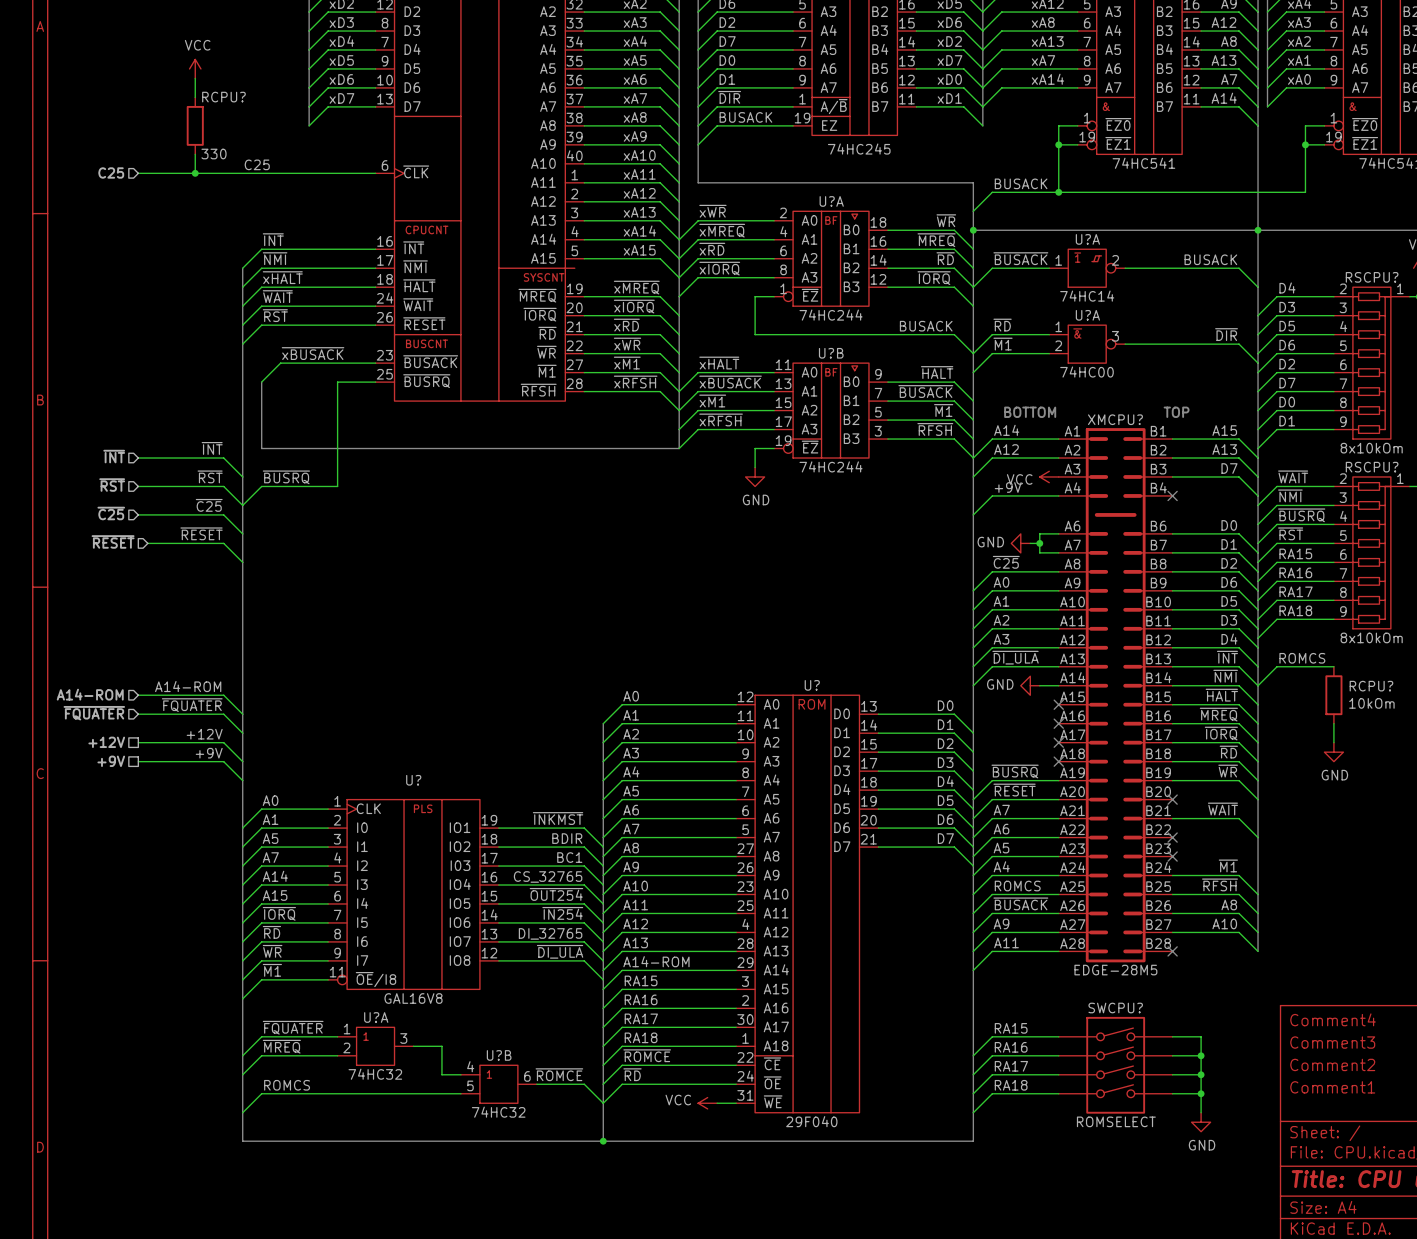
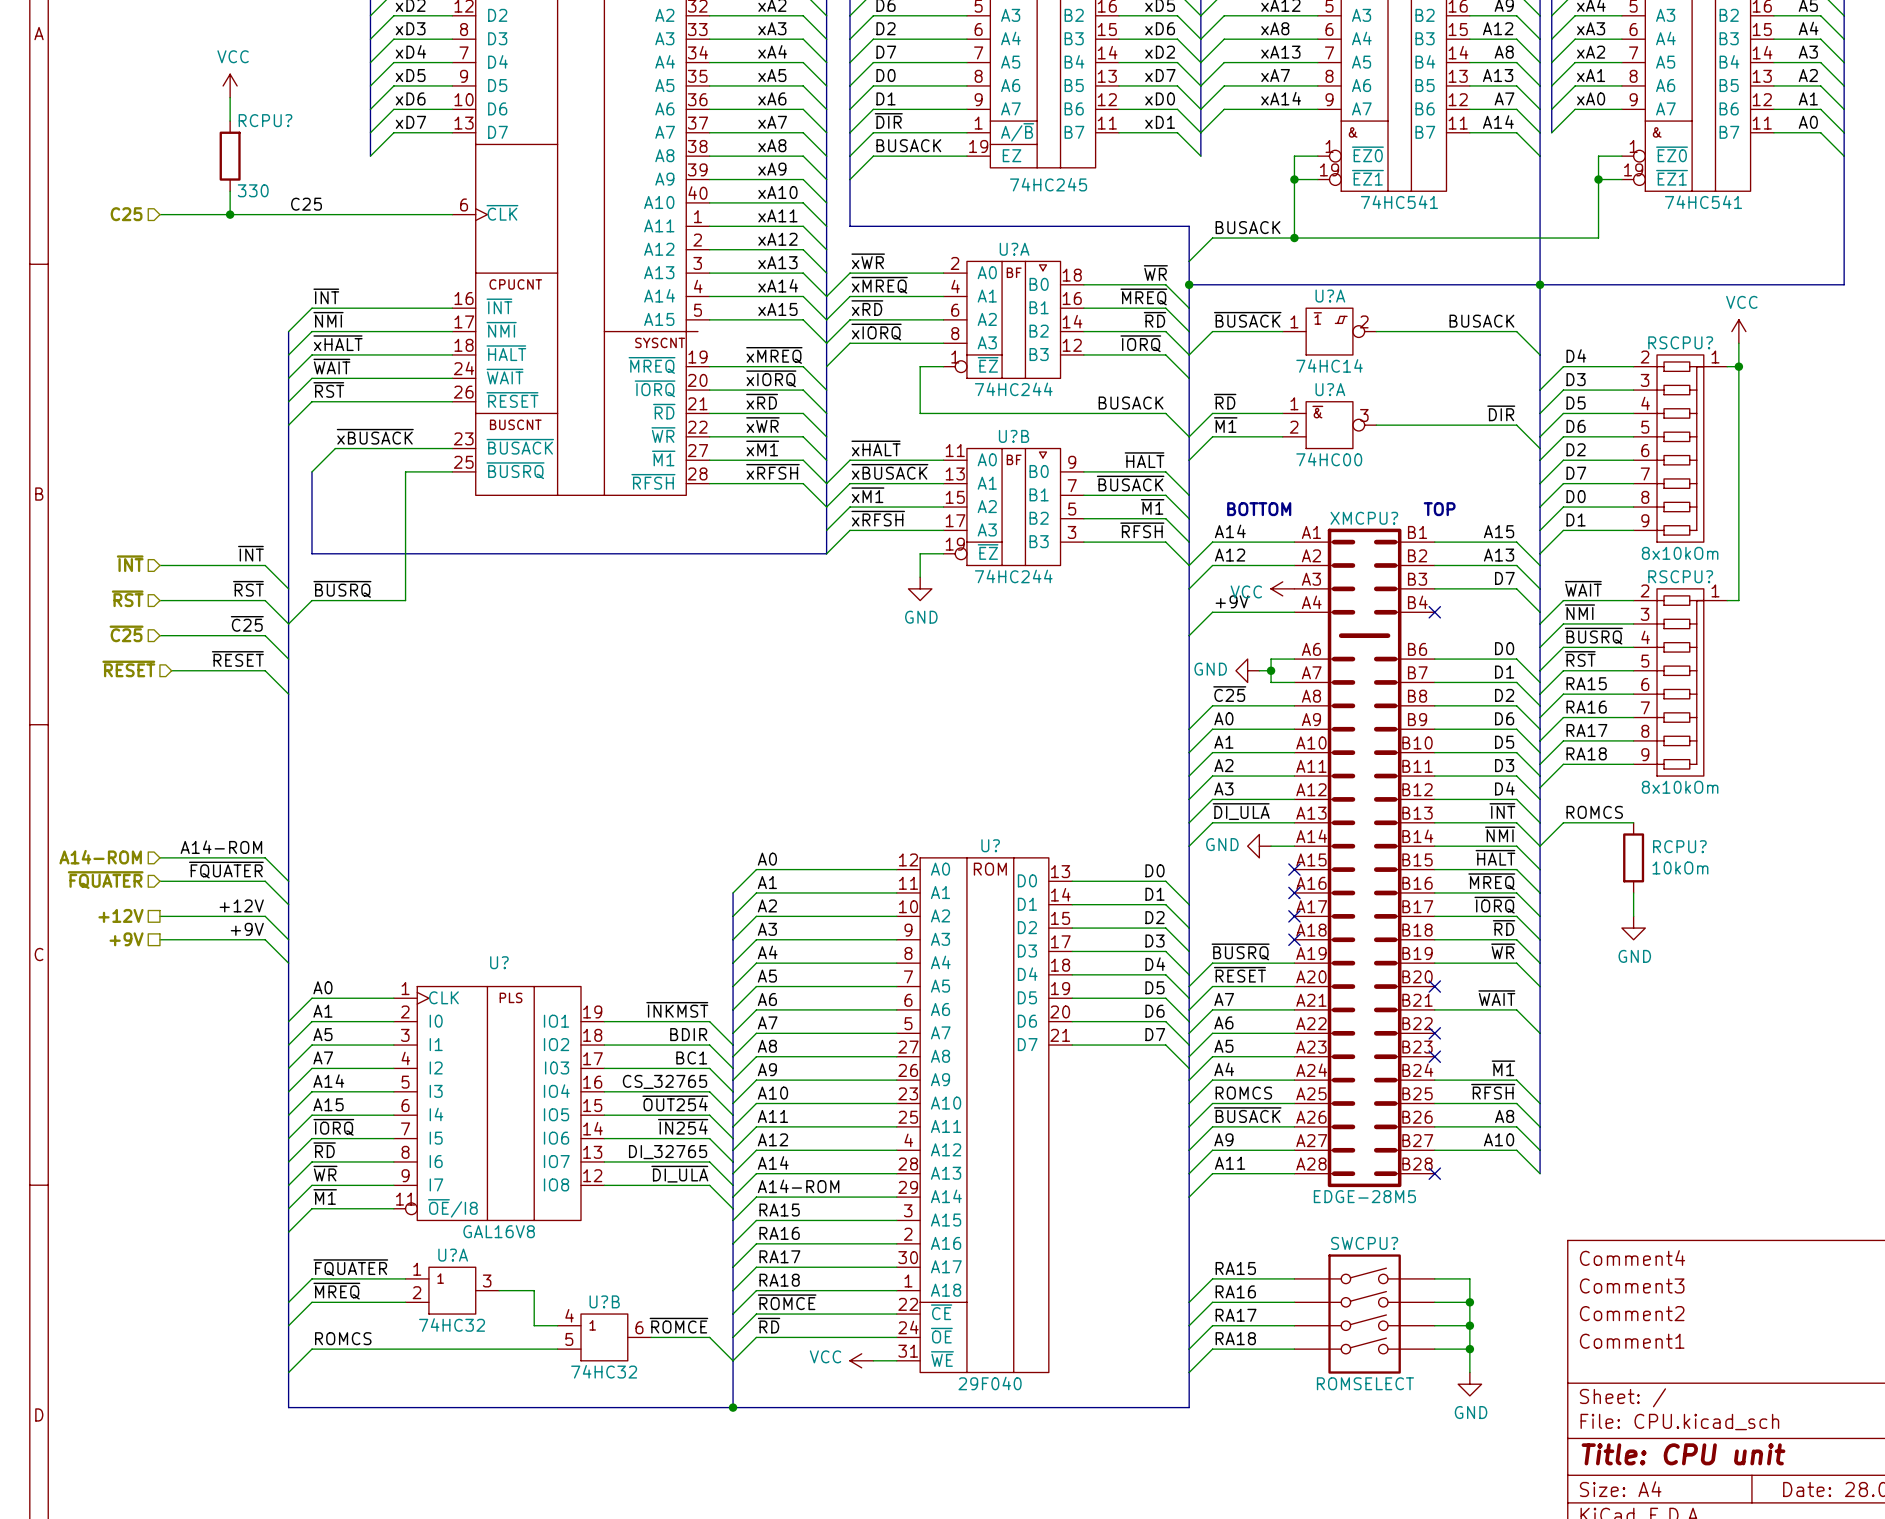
label: A13 (635, 942) -> A14 (773, 1162)

